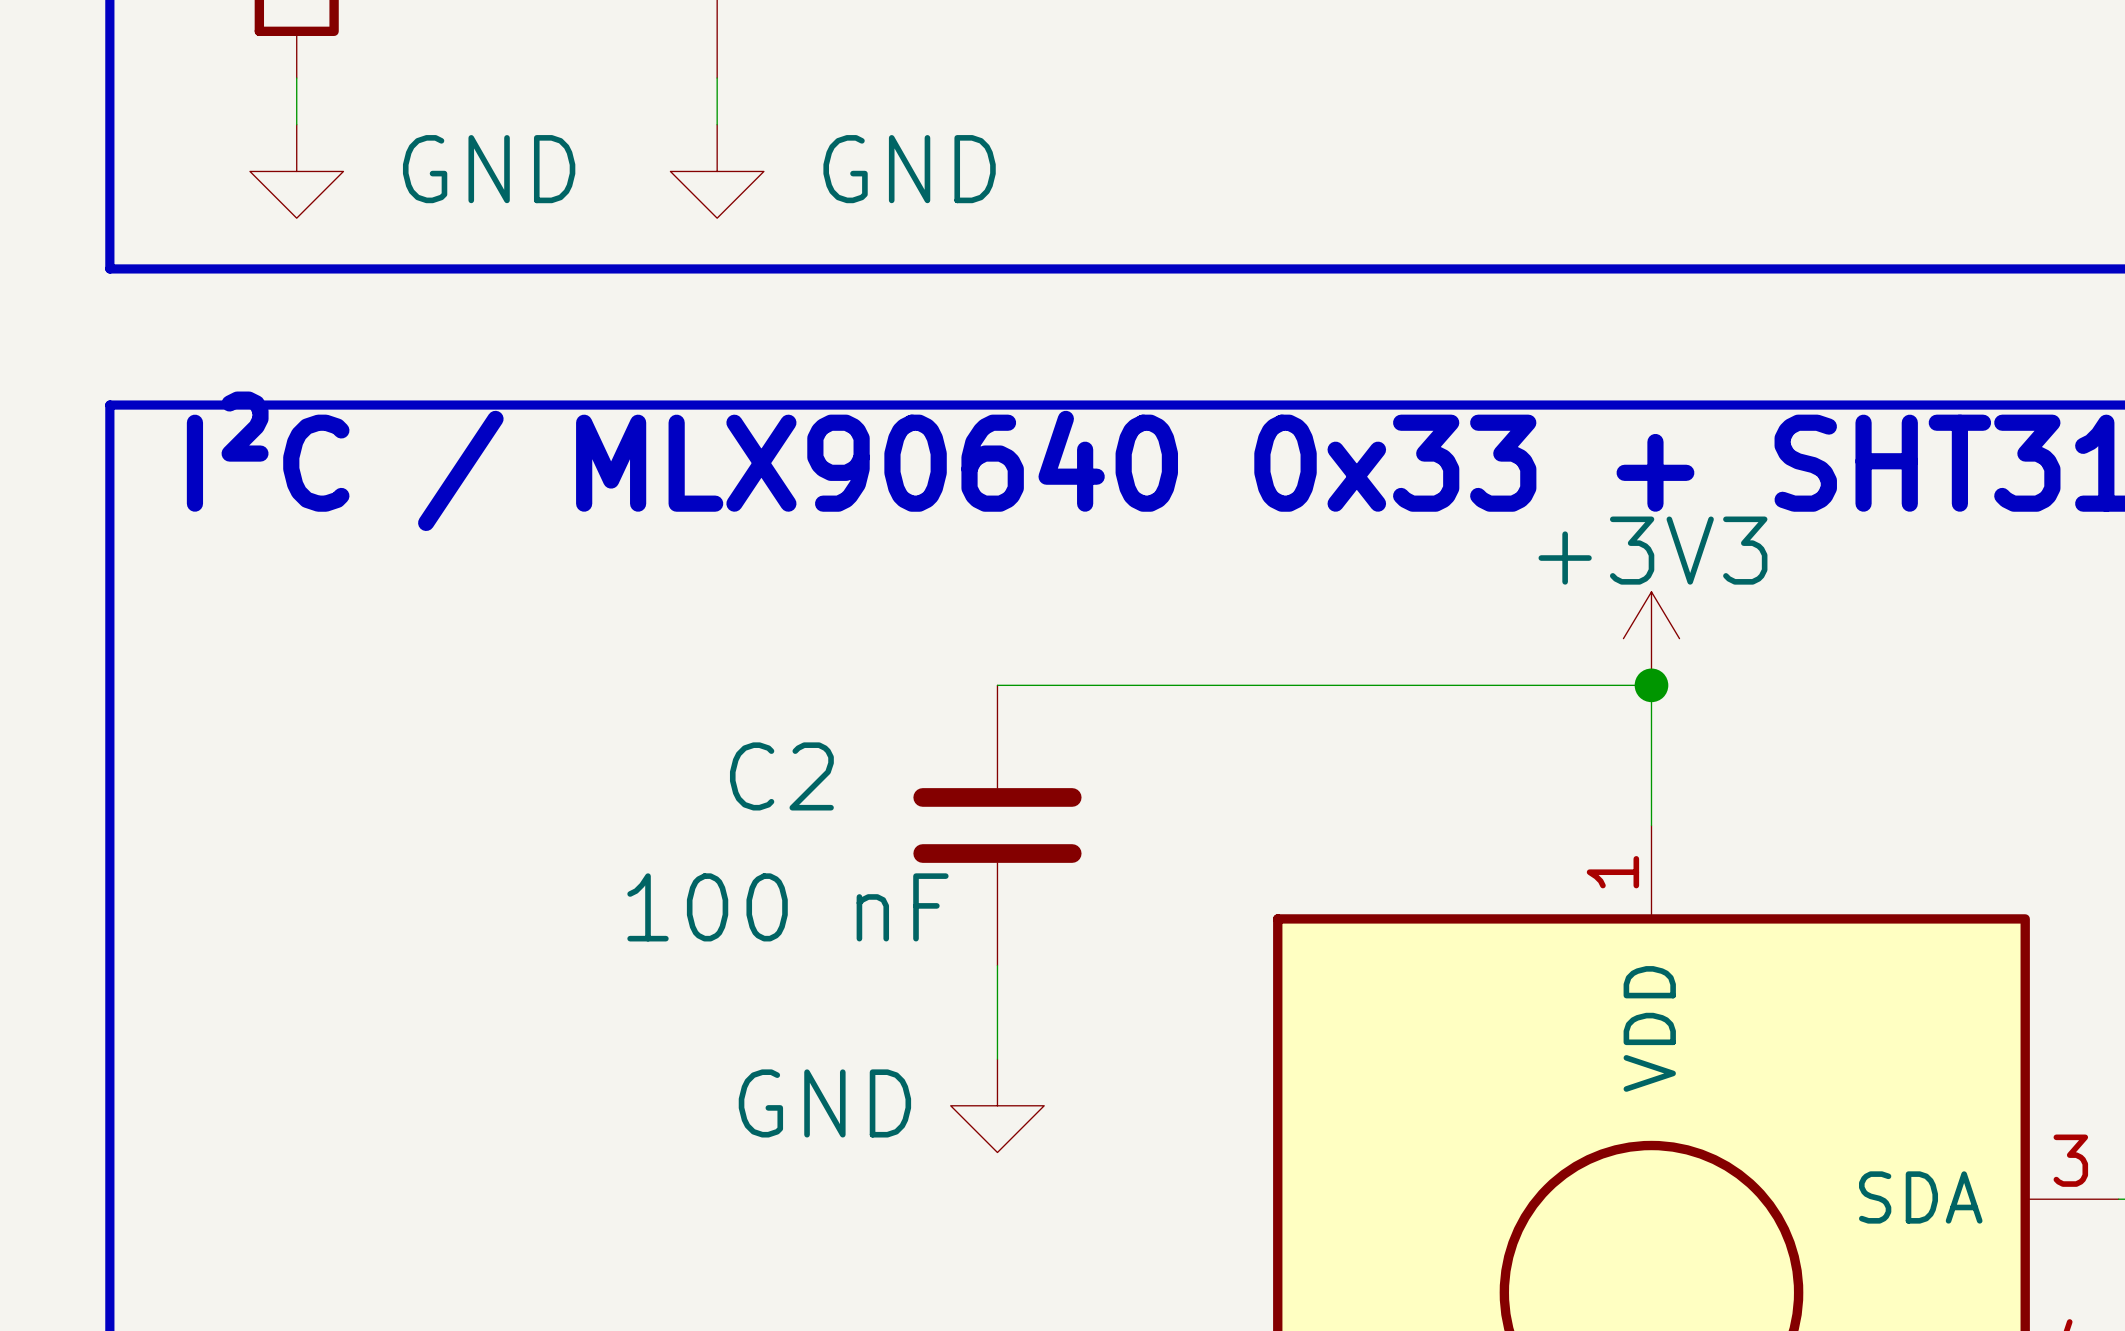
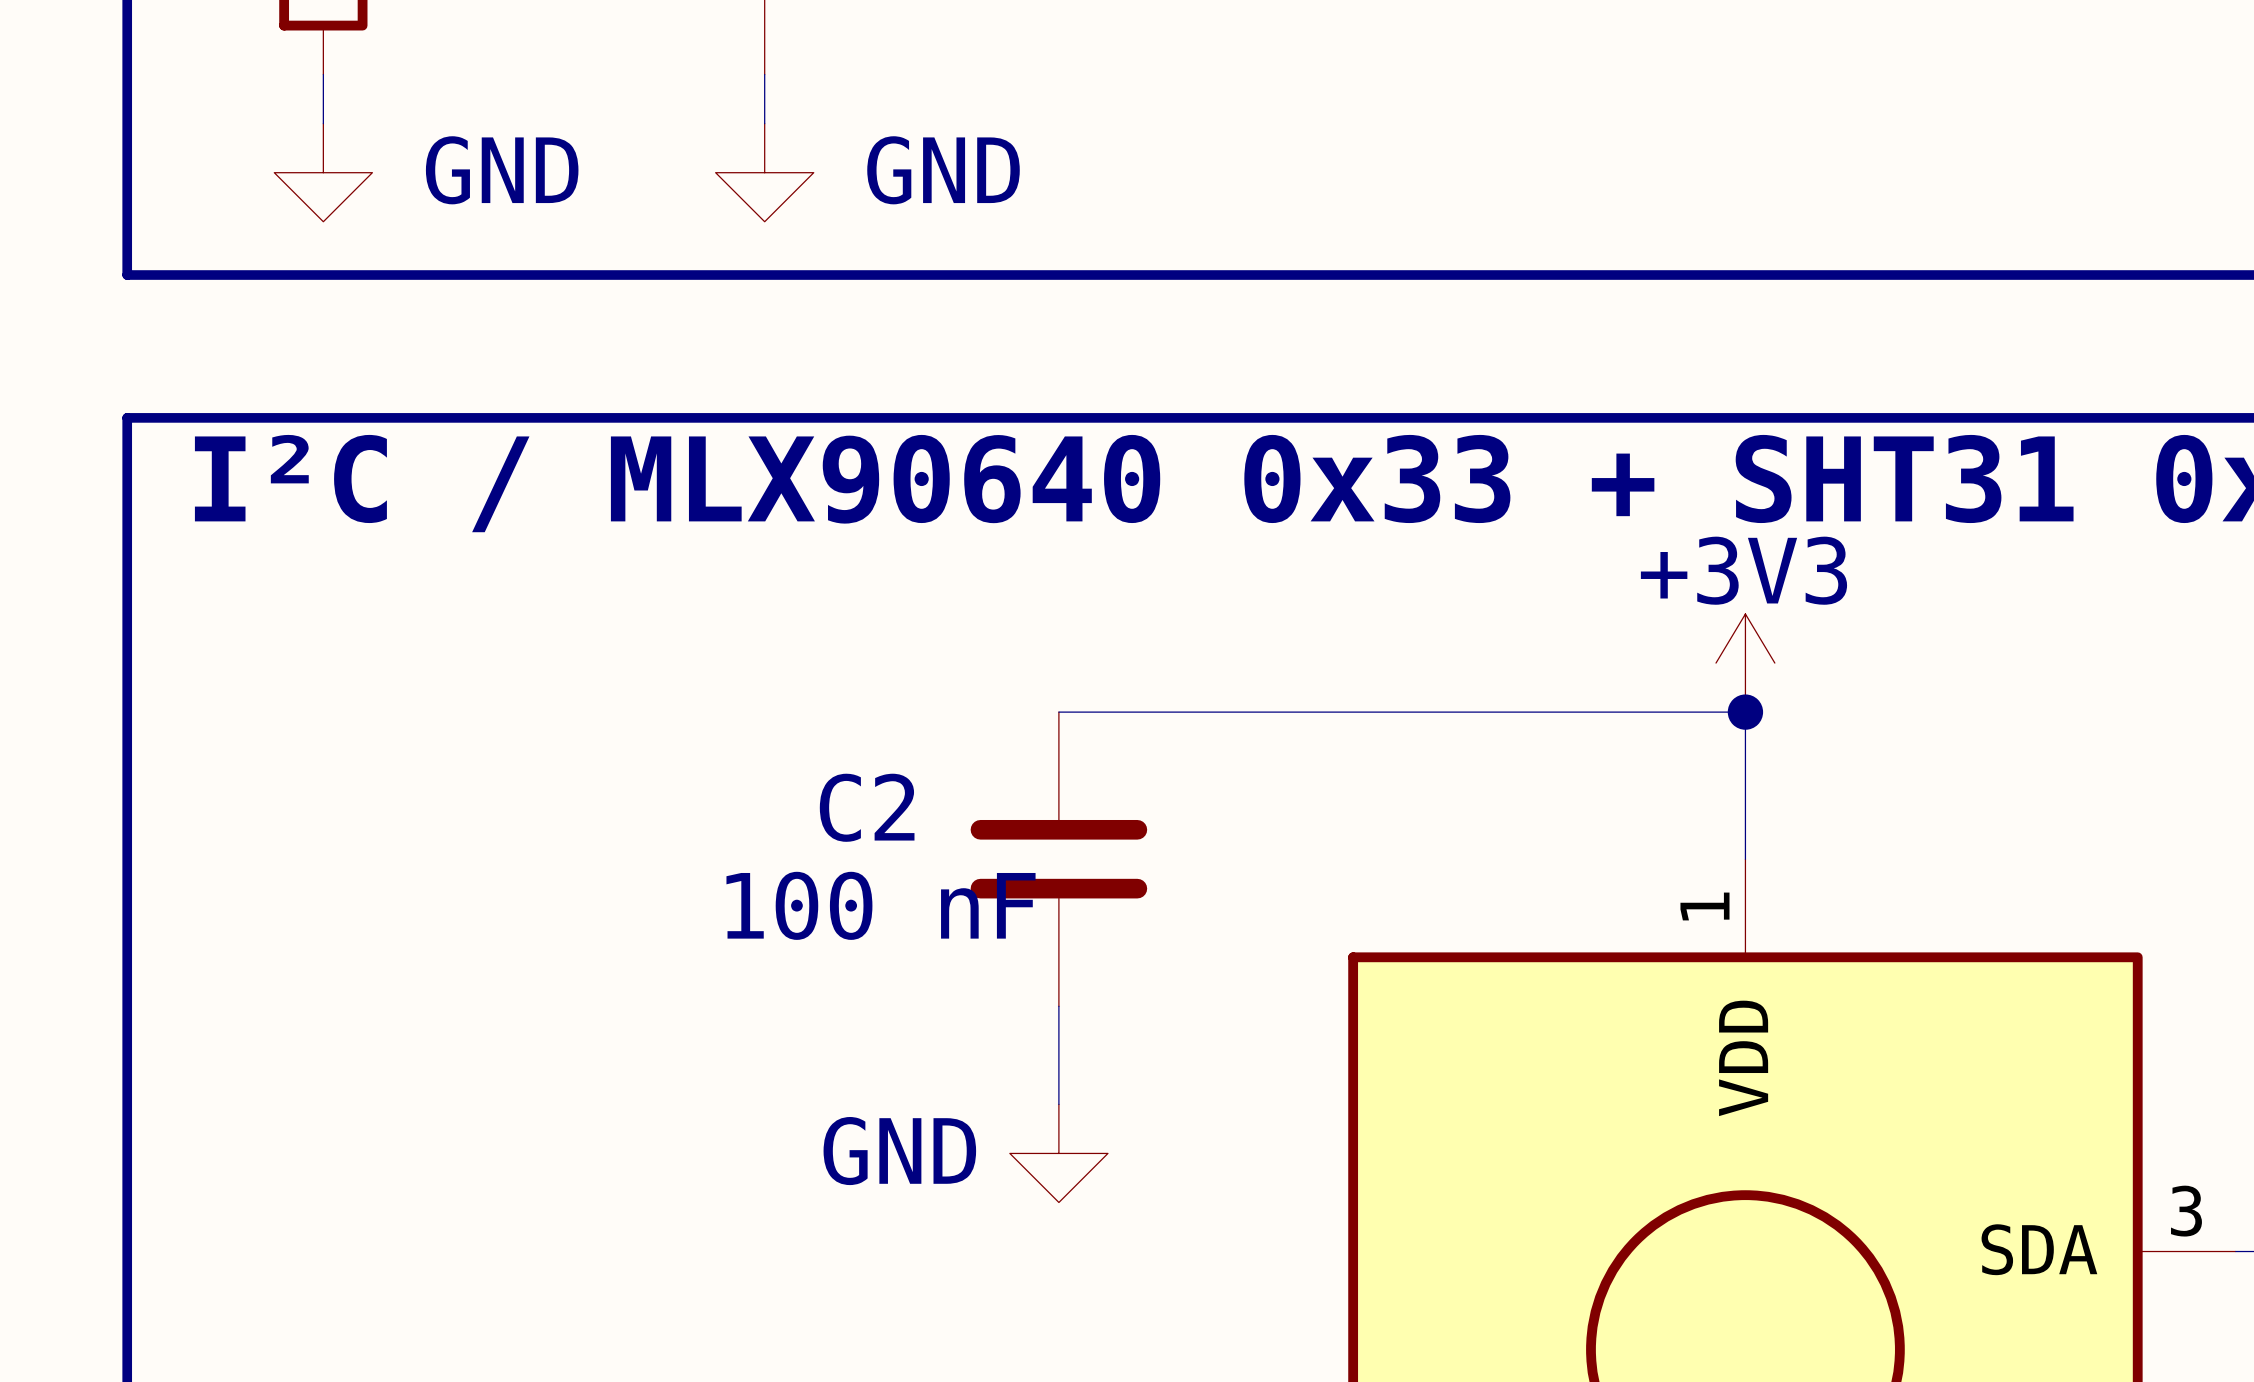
C2 name position: C2 (781, 776) -> C2 (867, 807)
C2 value position: 100 nF (787, 907) -> 100 nF (881, 905)

